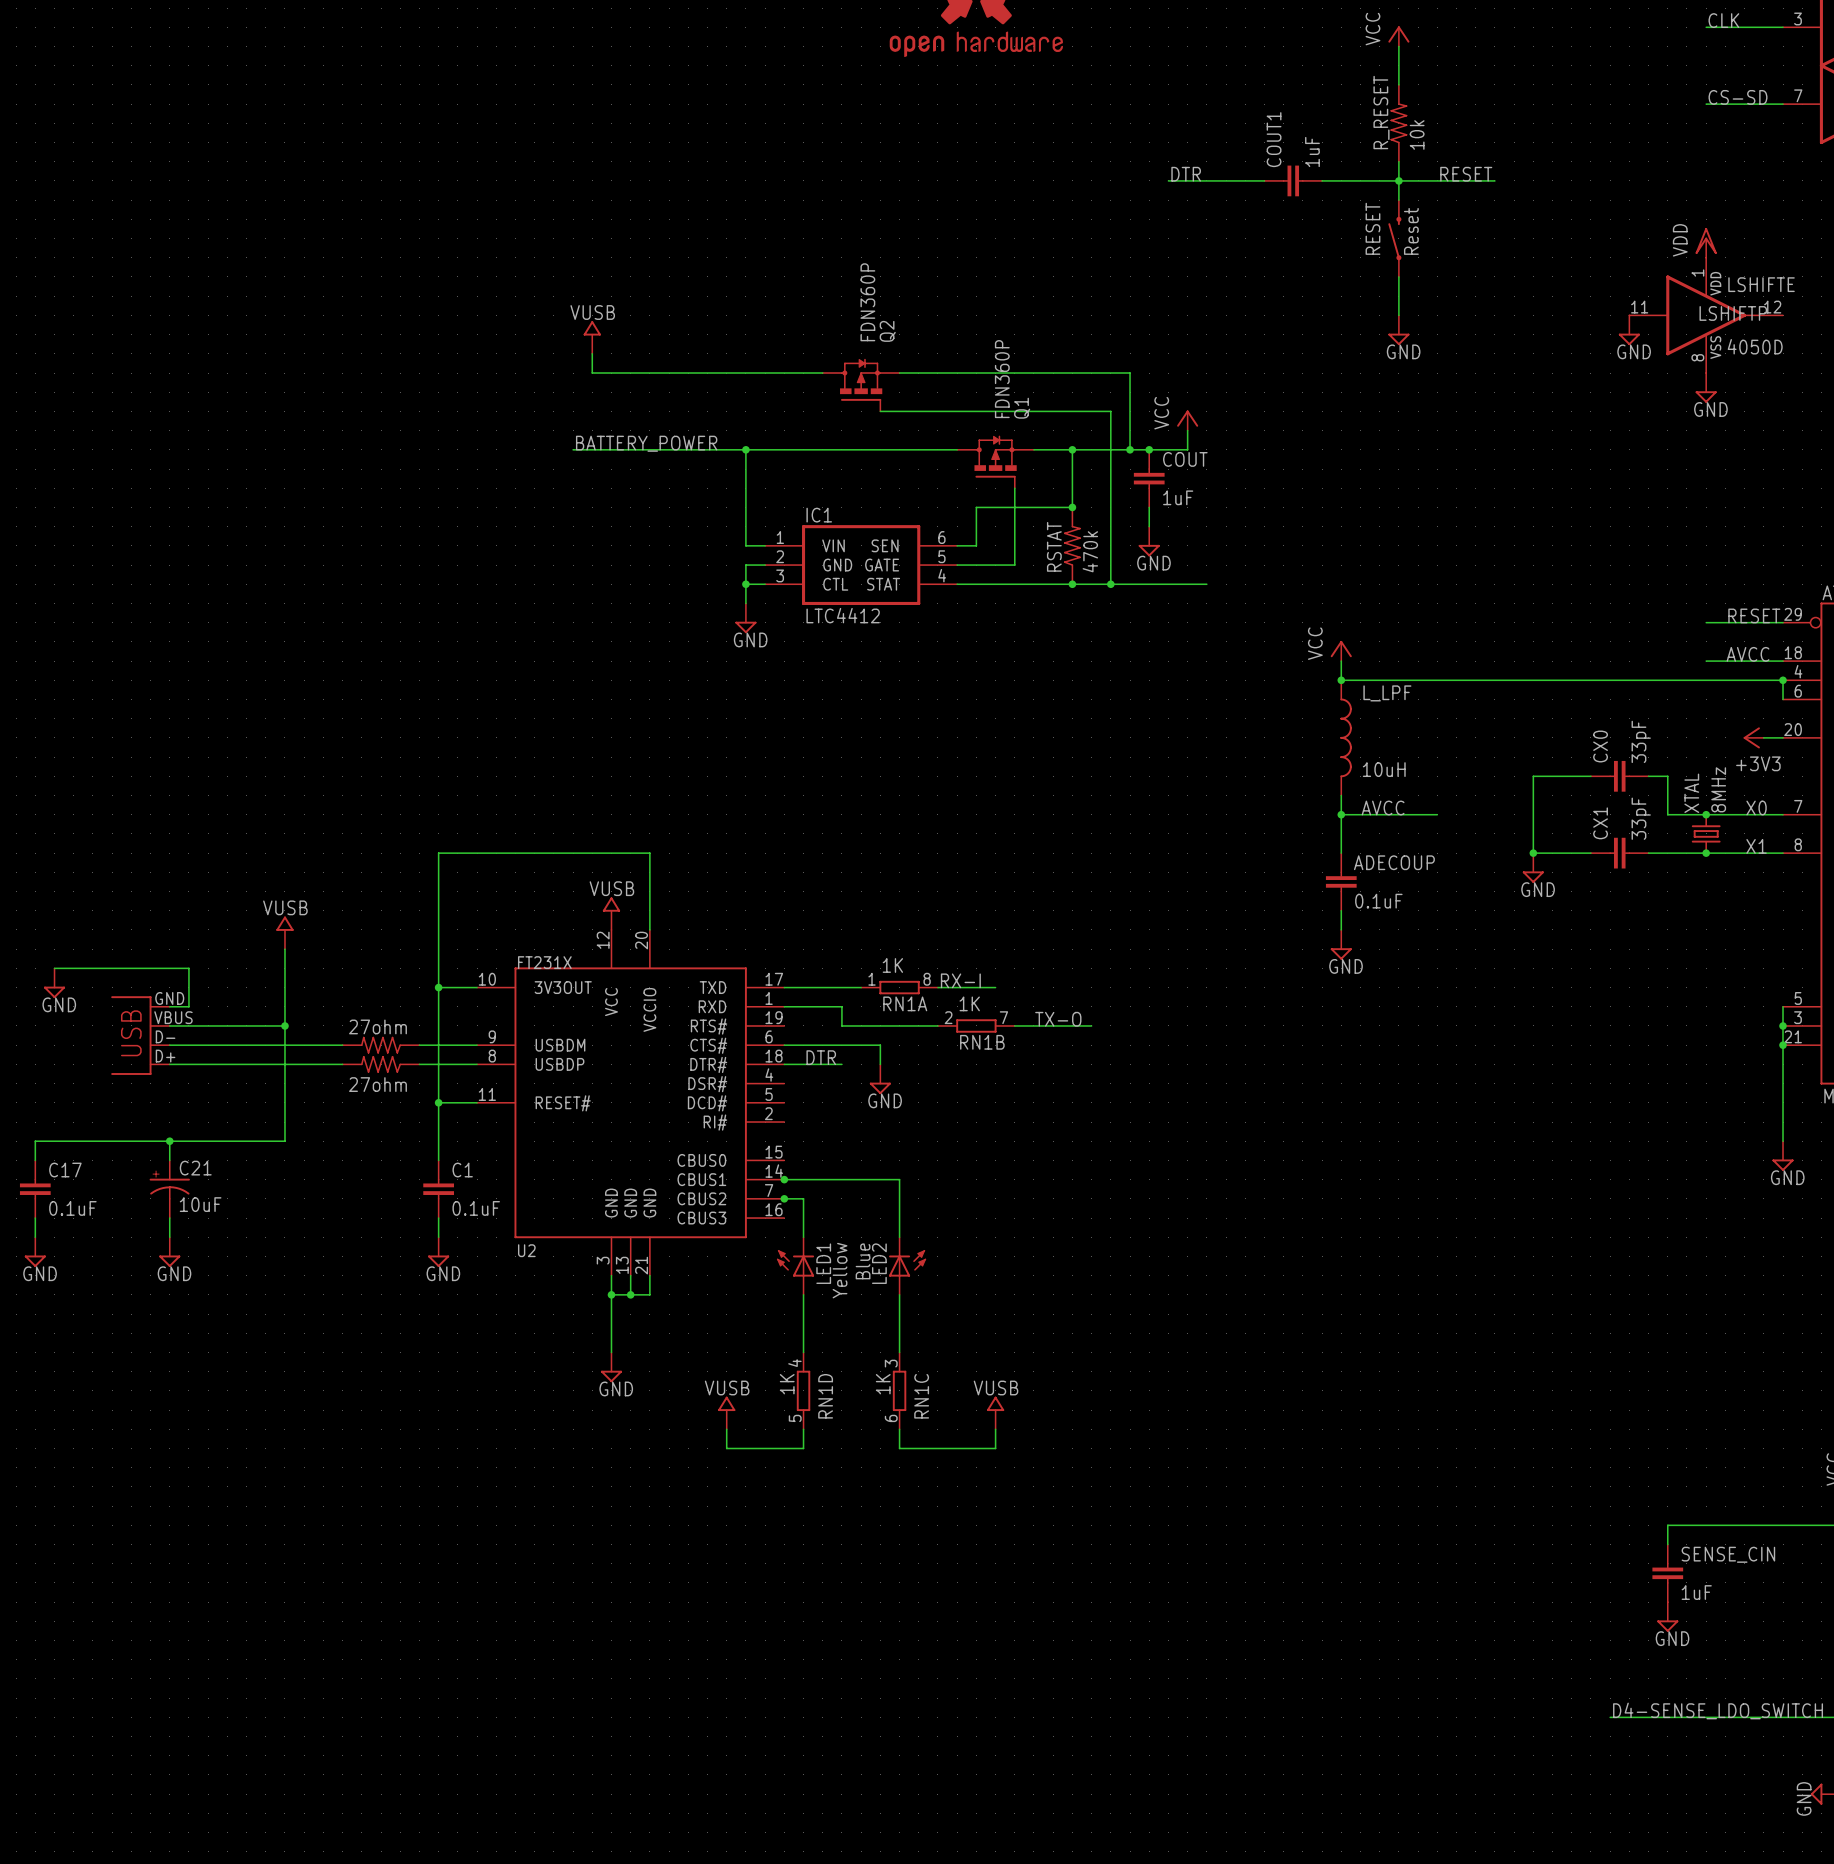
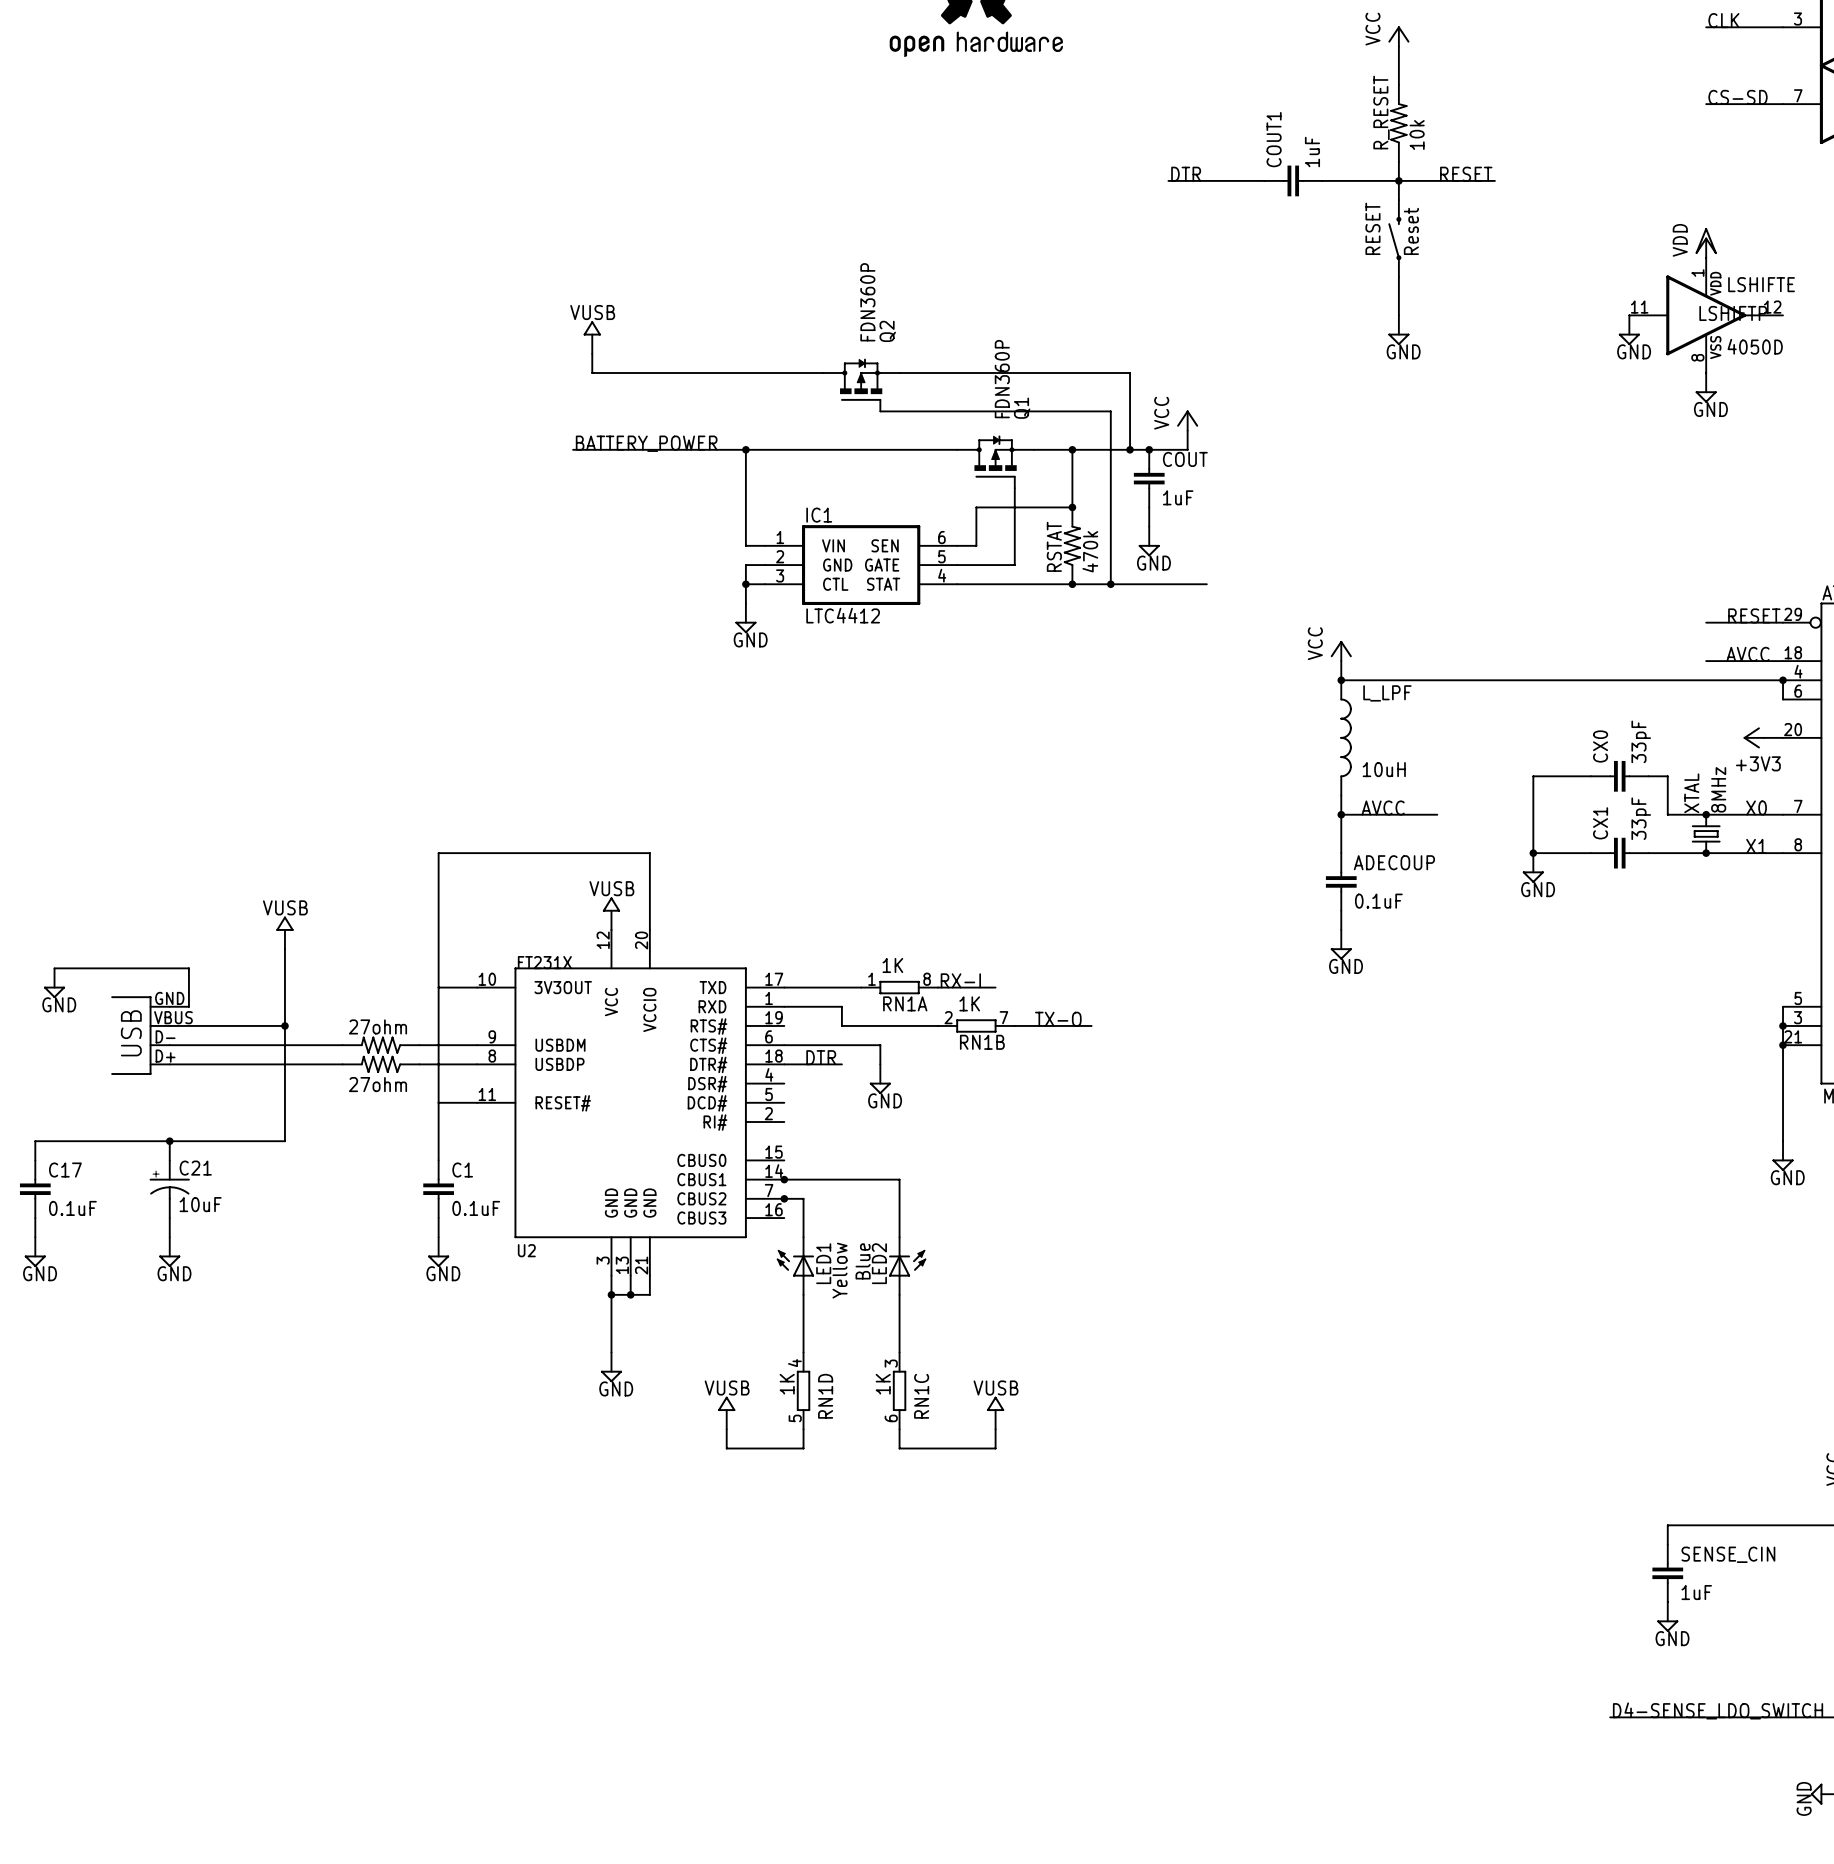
junction: (438, 987) -> none
junction: (438, 1102) -> none

